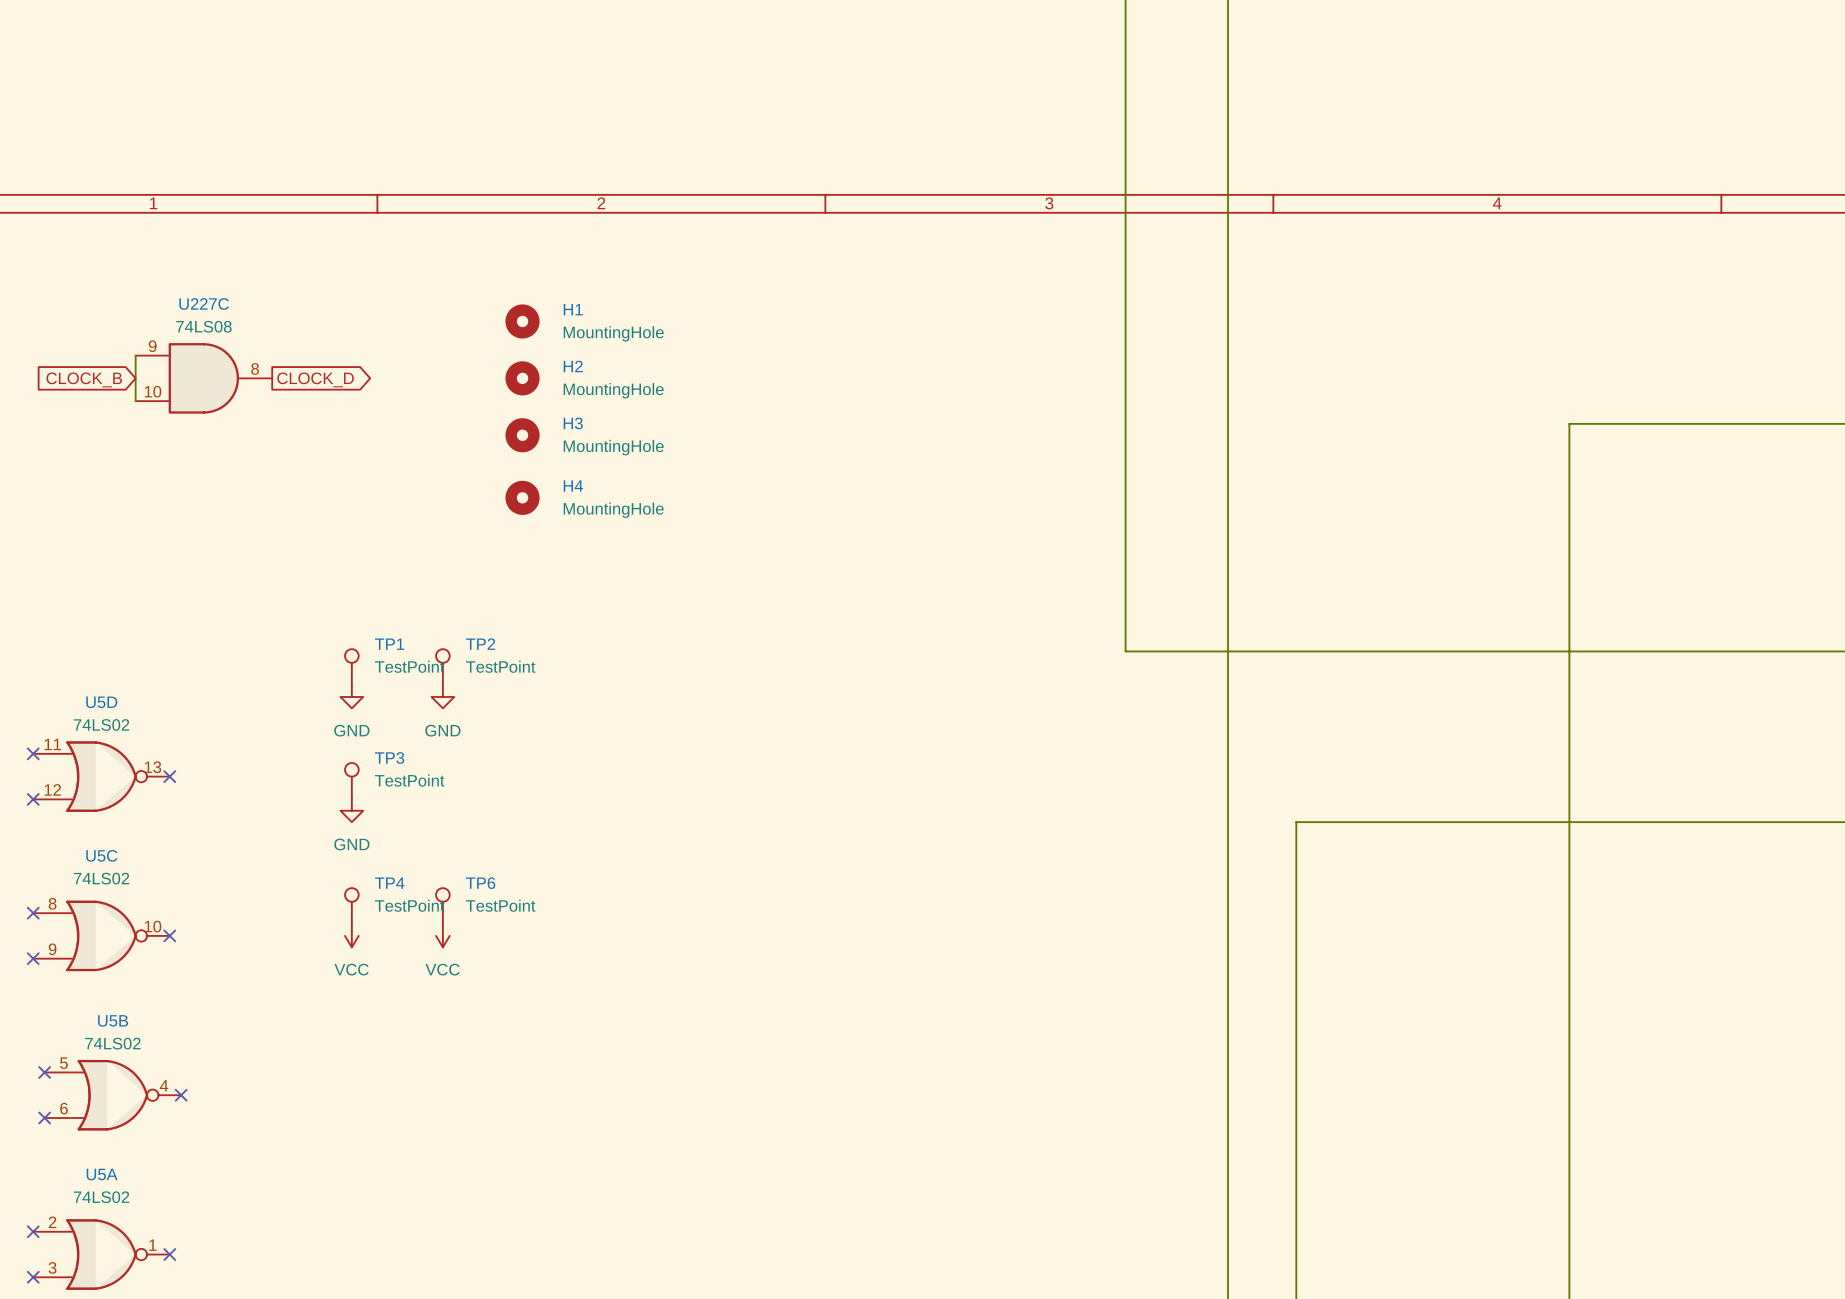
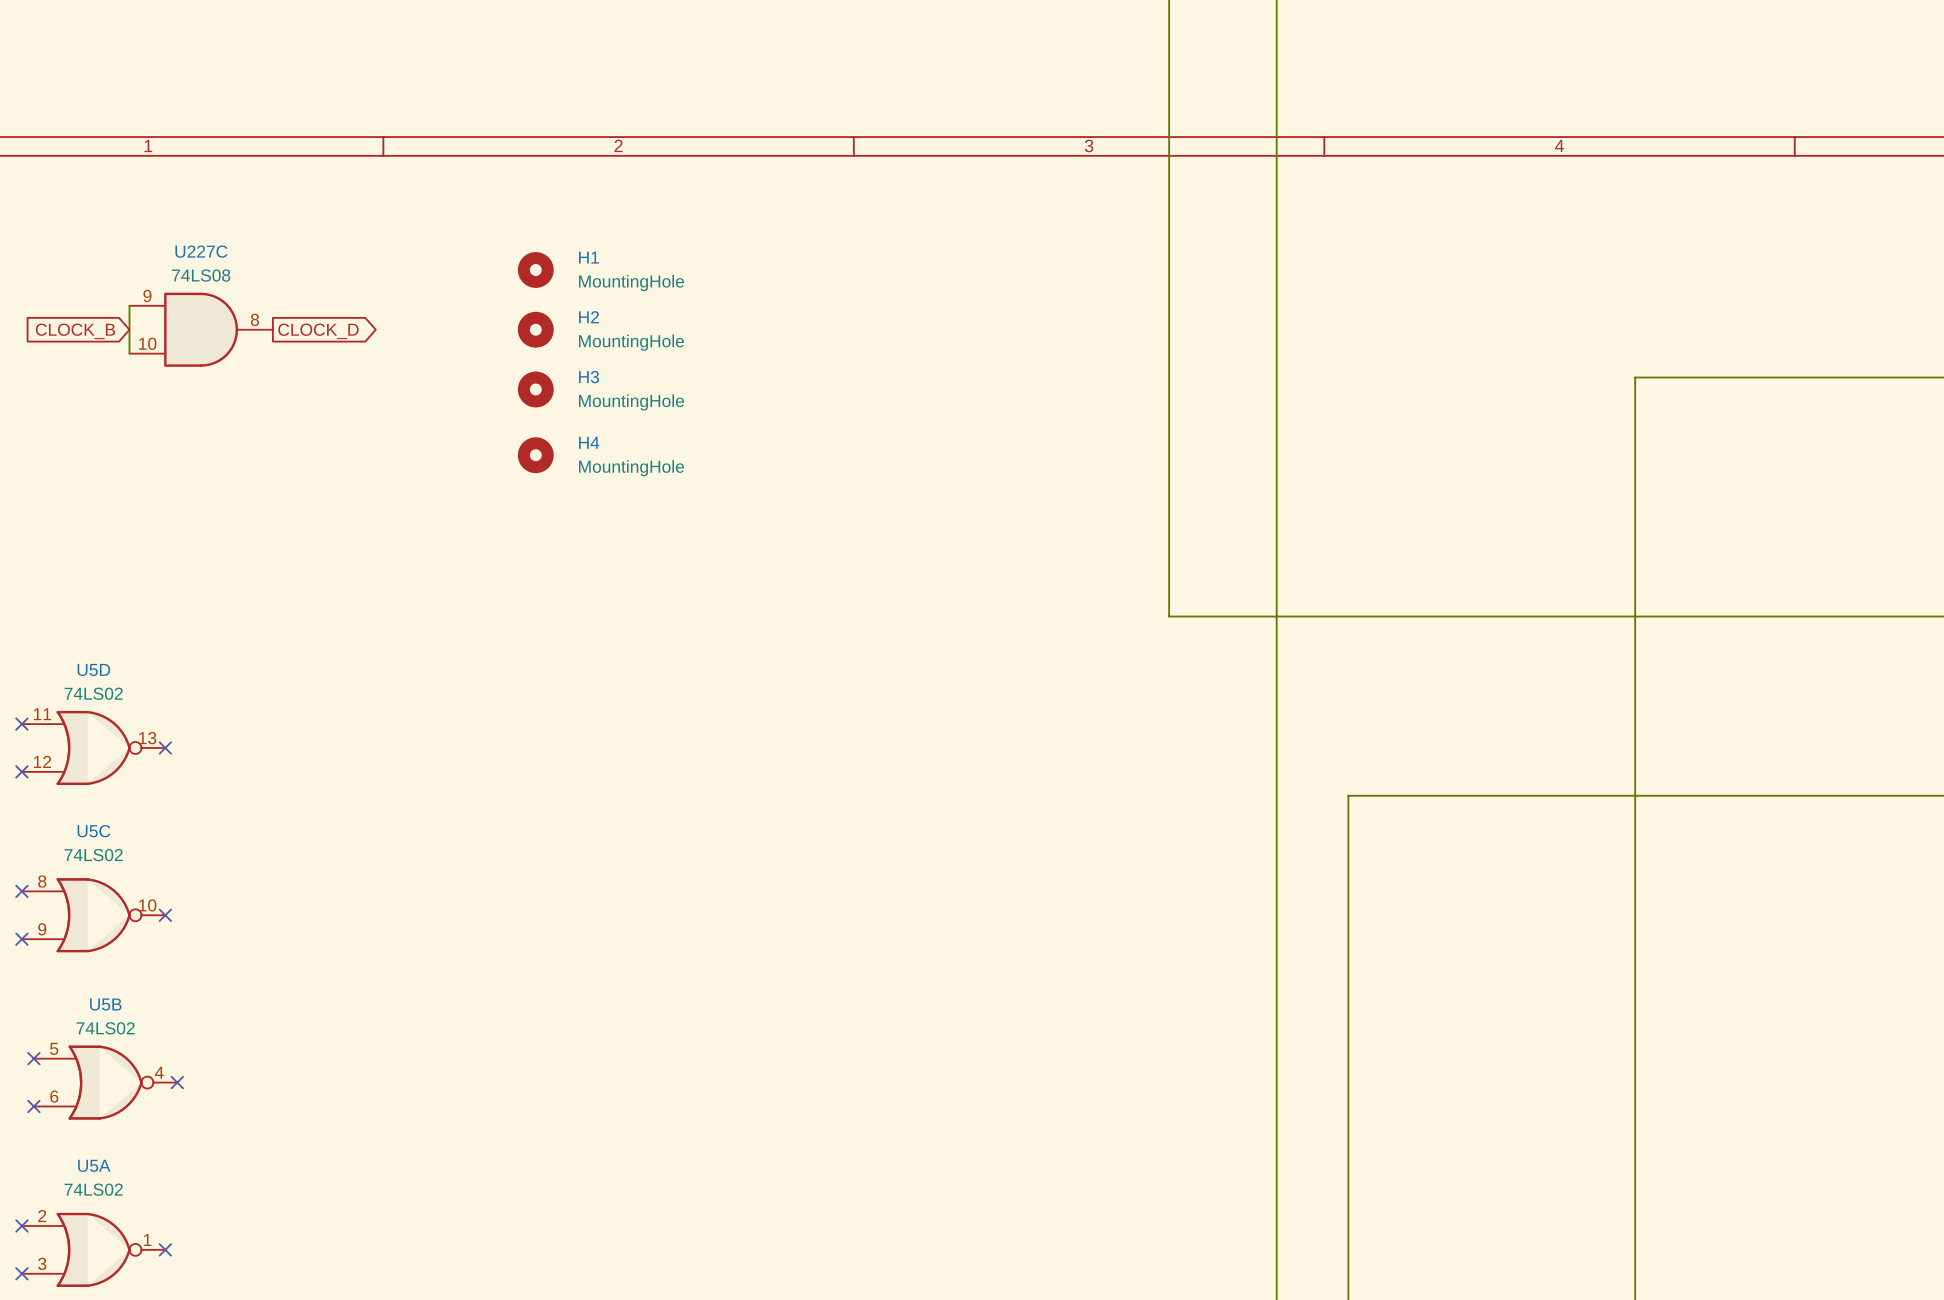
TP1: TestPoint (351, 667) -> none
TP2: TestPoint (442, 667) -> none
power symbol: GND (351, 696) -> none
power symbol: GND (442, 696) -> none
TP3: TestPoint (351, 781) -> none
power symbol: GND (351, 810) -> none
TP4: TestPoint (351, 906) -> none
TP6: TestPoint (442, 906) -> none
power symbol: VCC (351, 935) -> none
power symbol: VCC (442, 935) -> none

